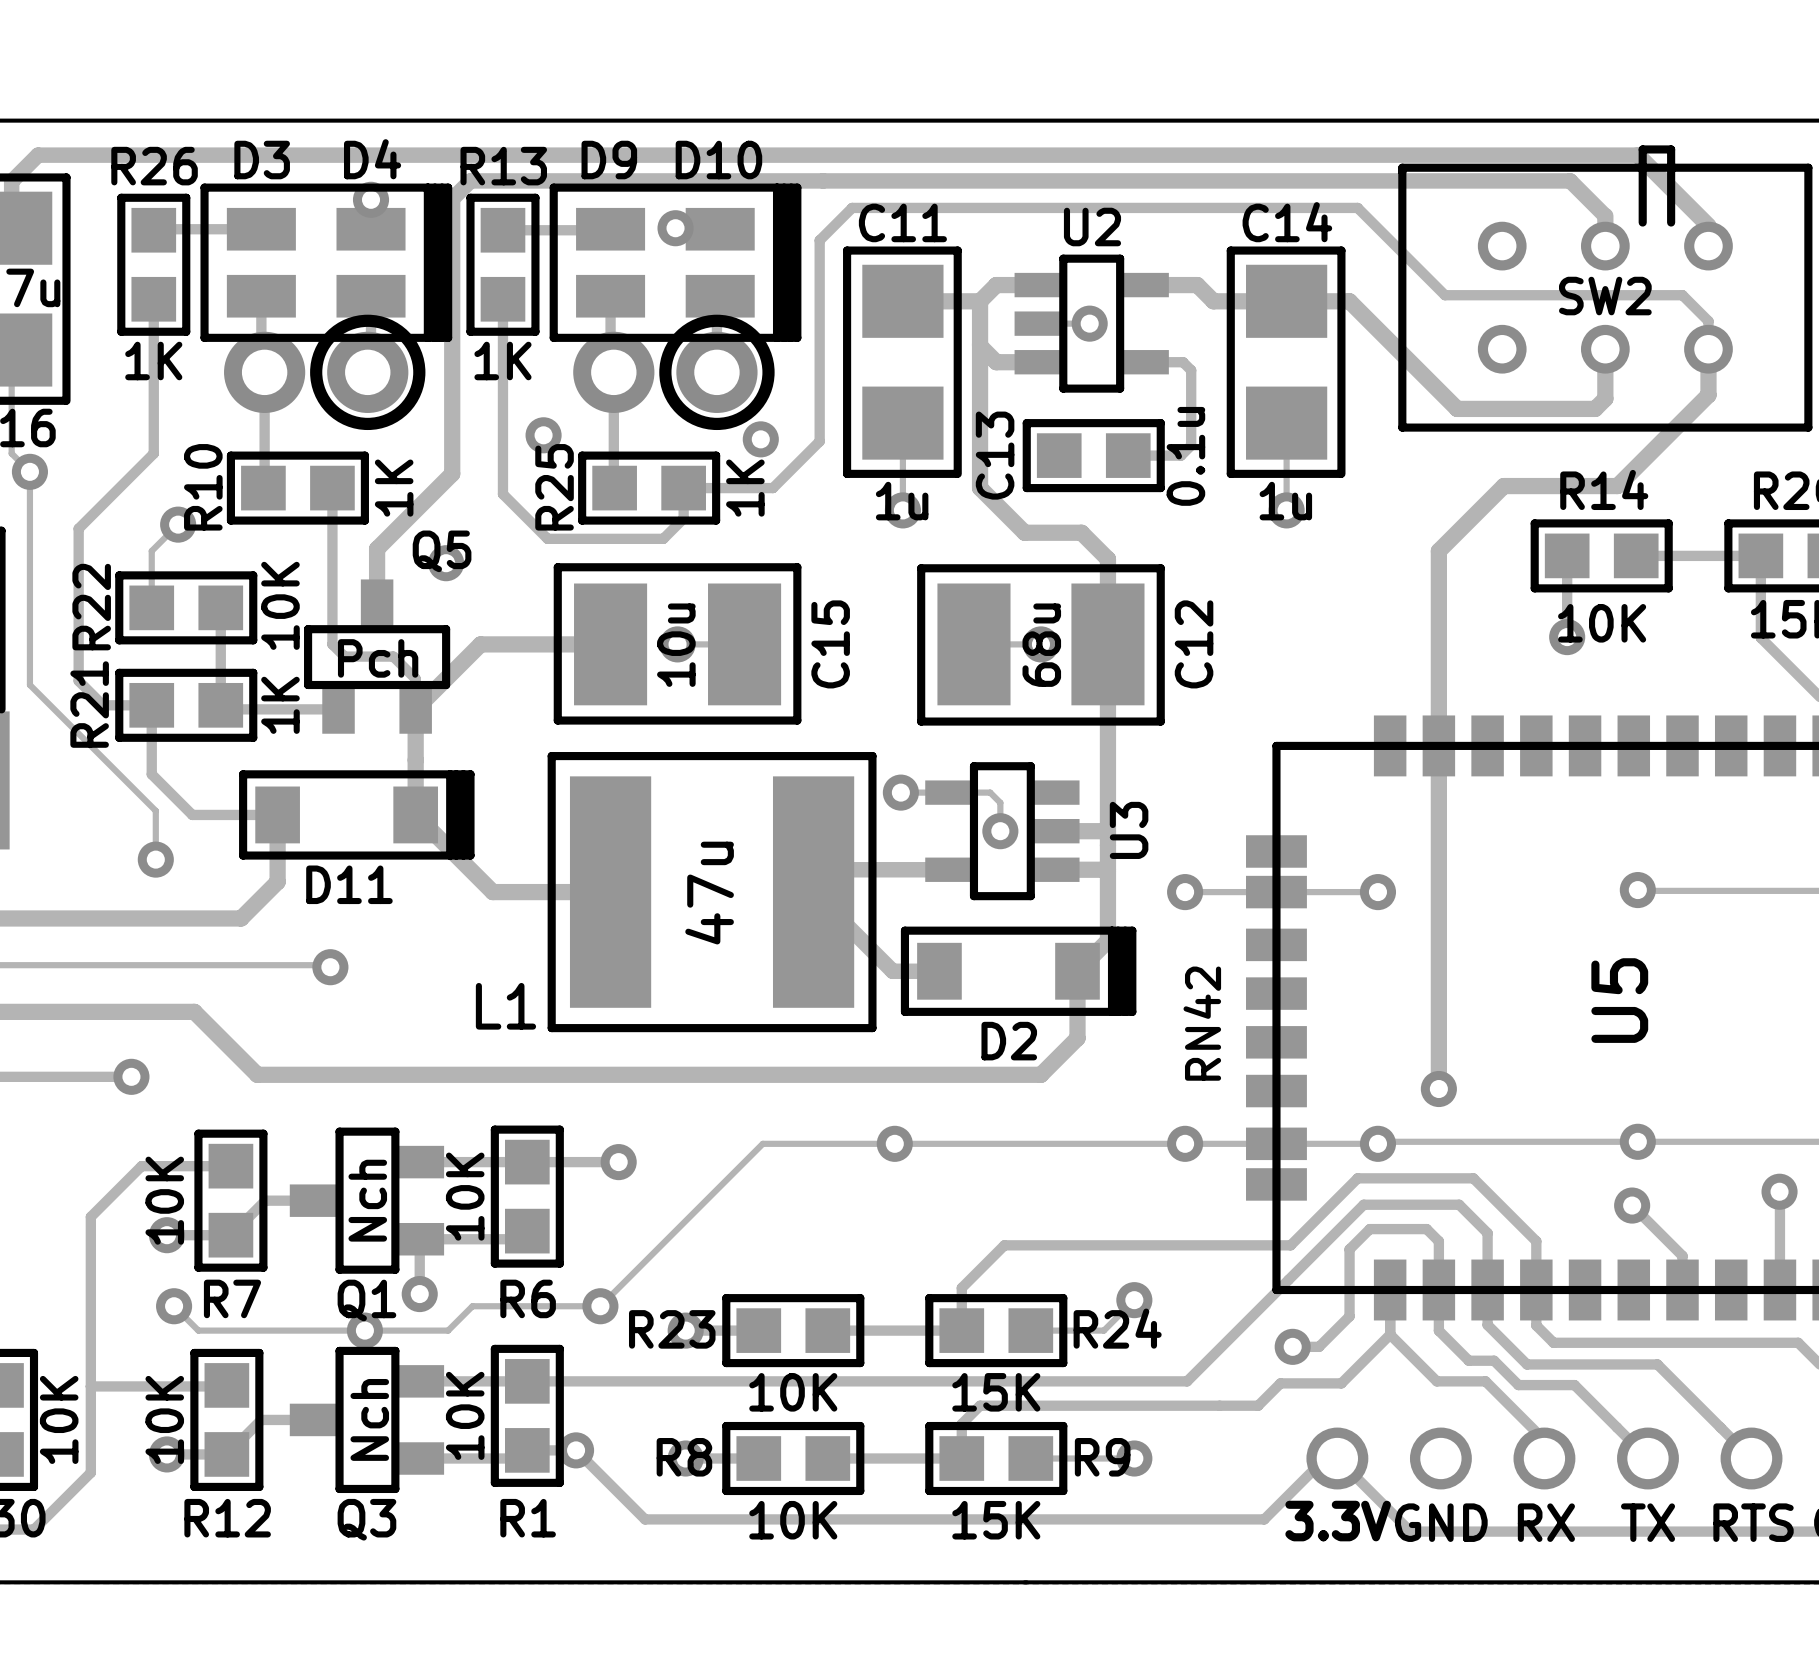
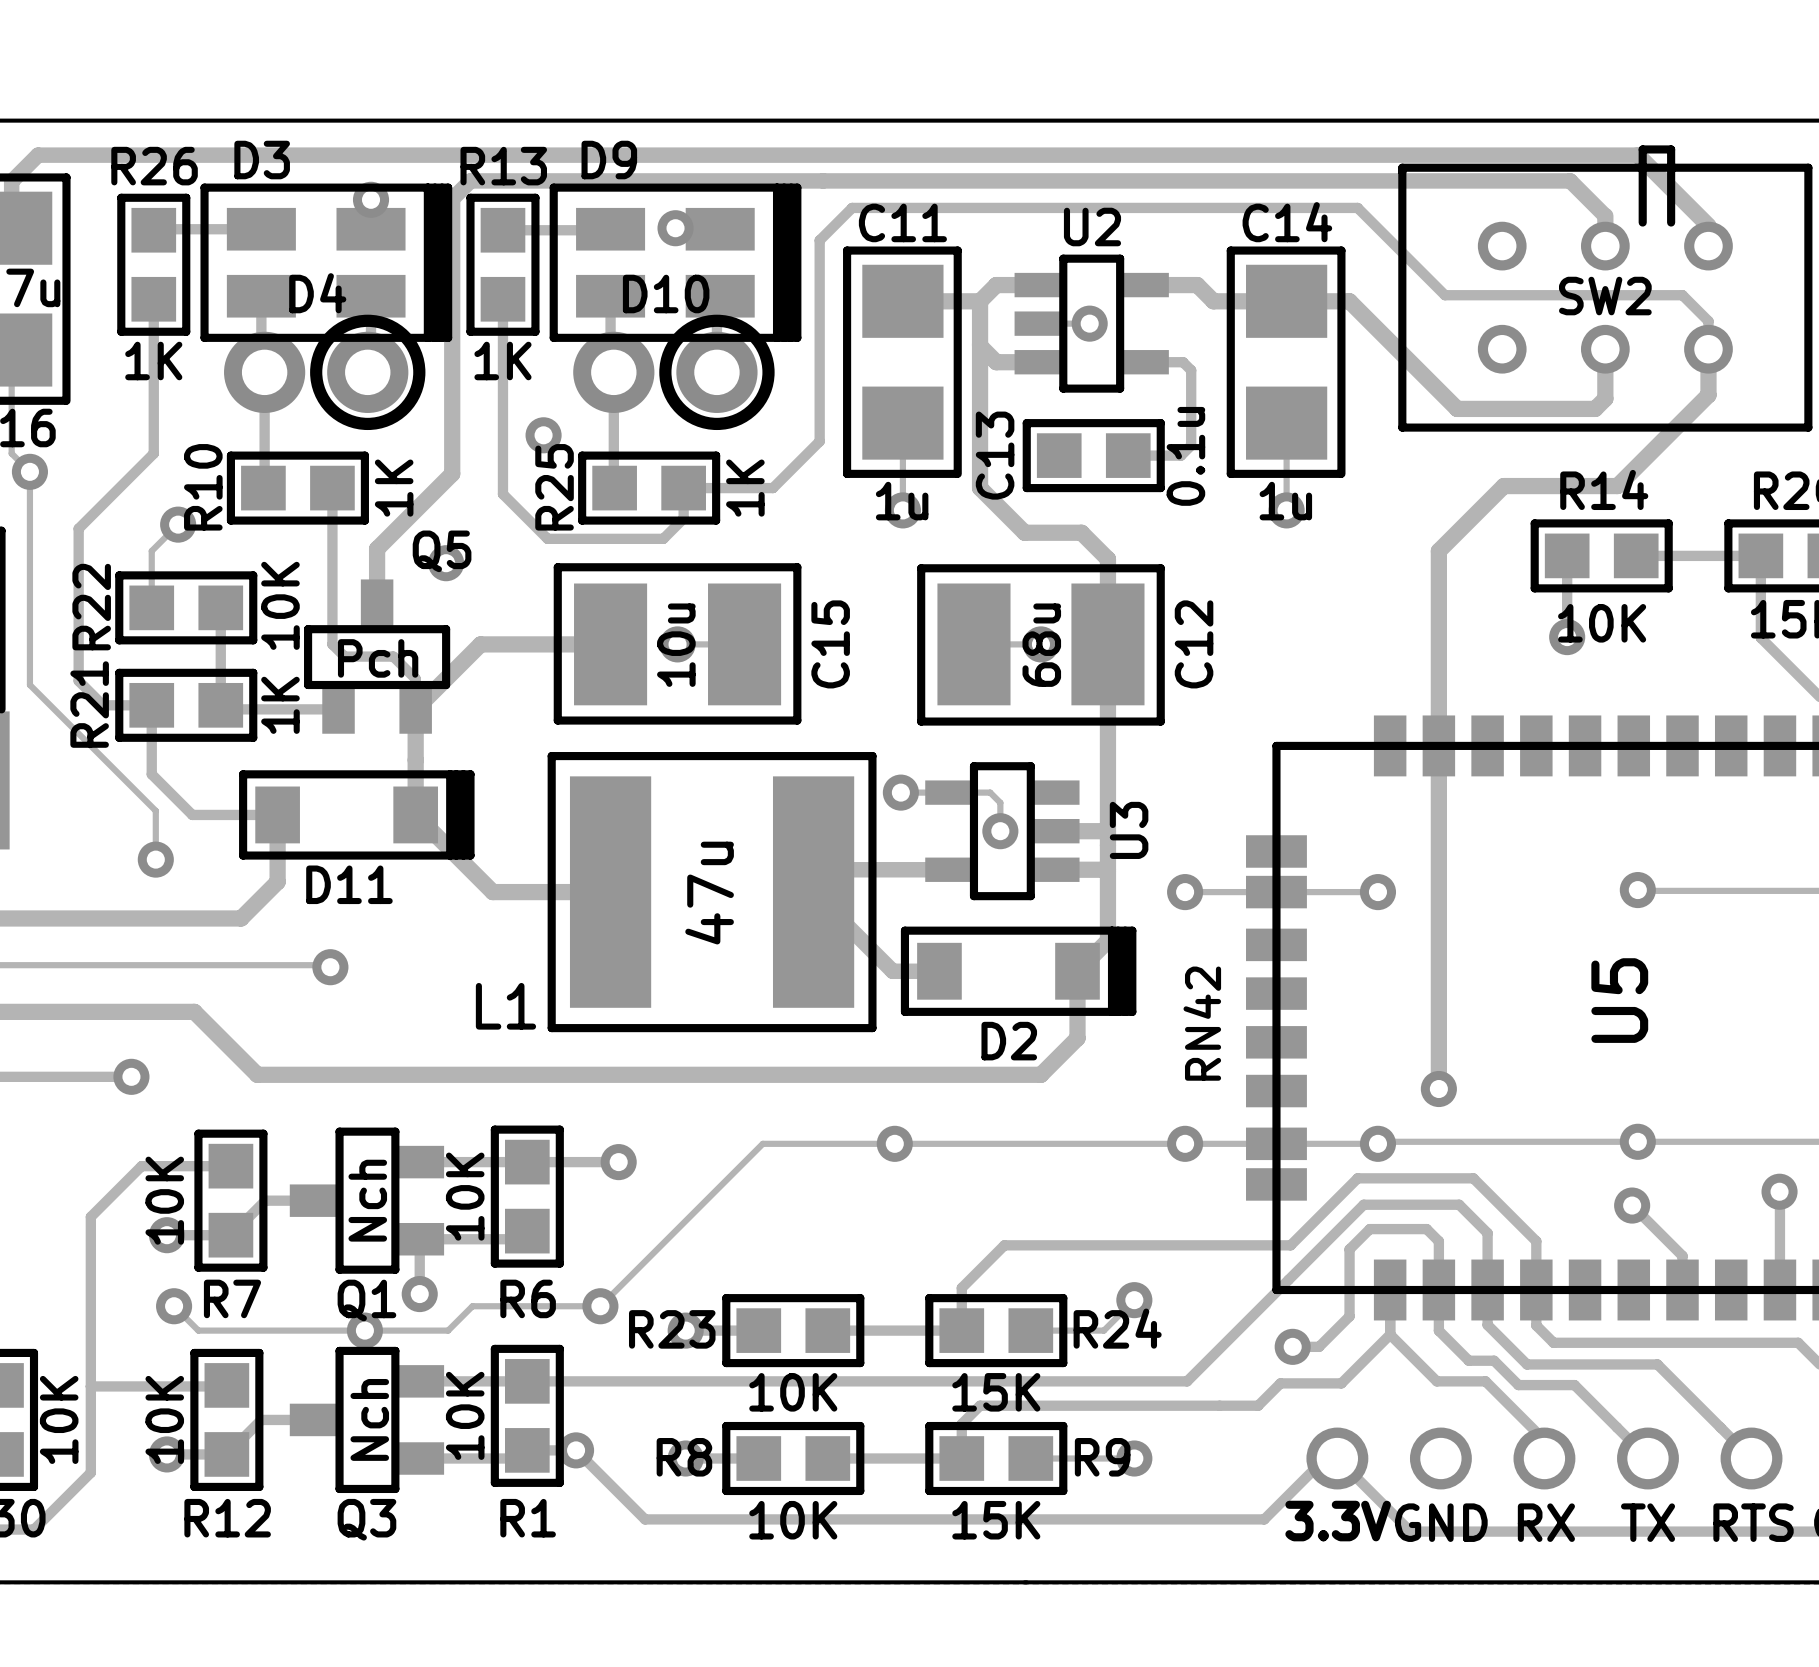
D4 name position: D4 (372, 159) -> D4 (317, 293)
D10 name position: D10 (718, 160) -> D10 (666, 294)
via: (760, 439) -> none

